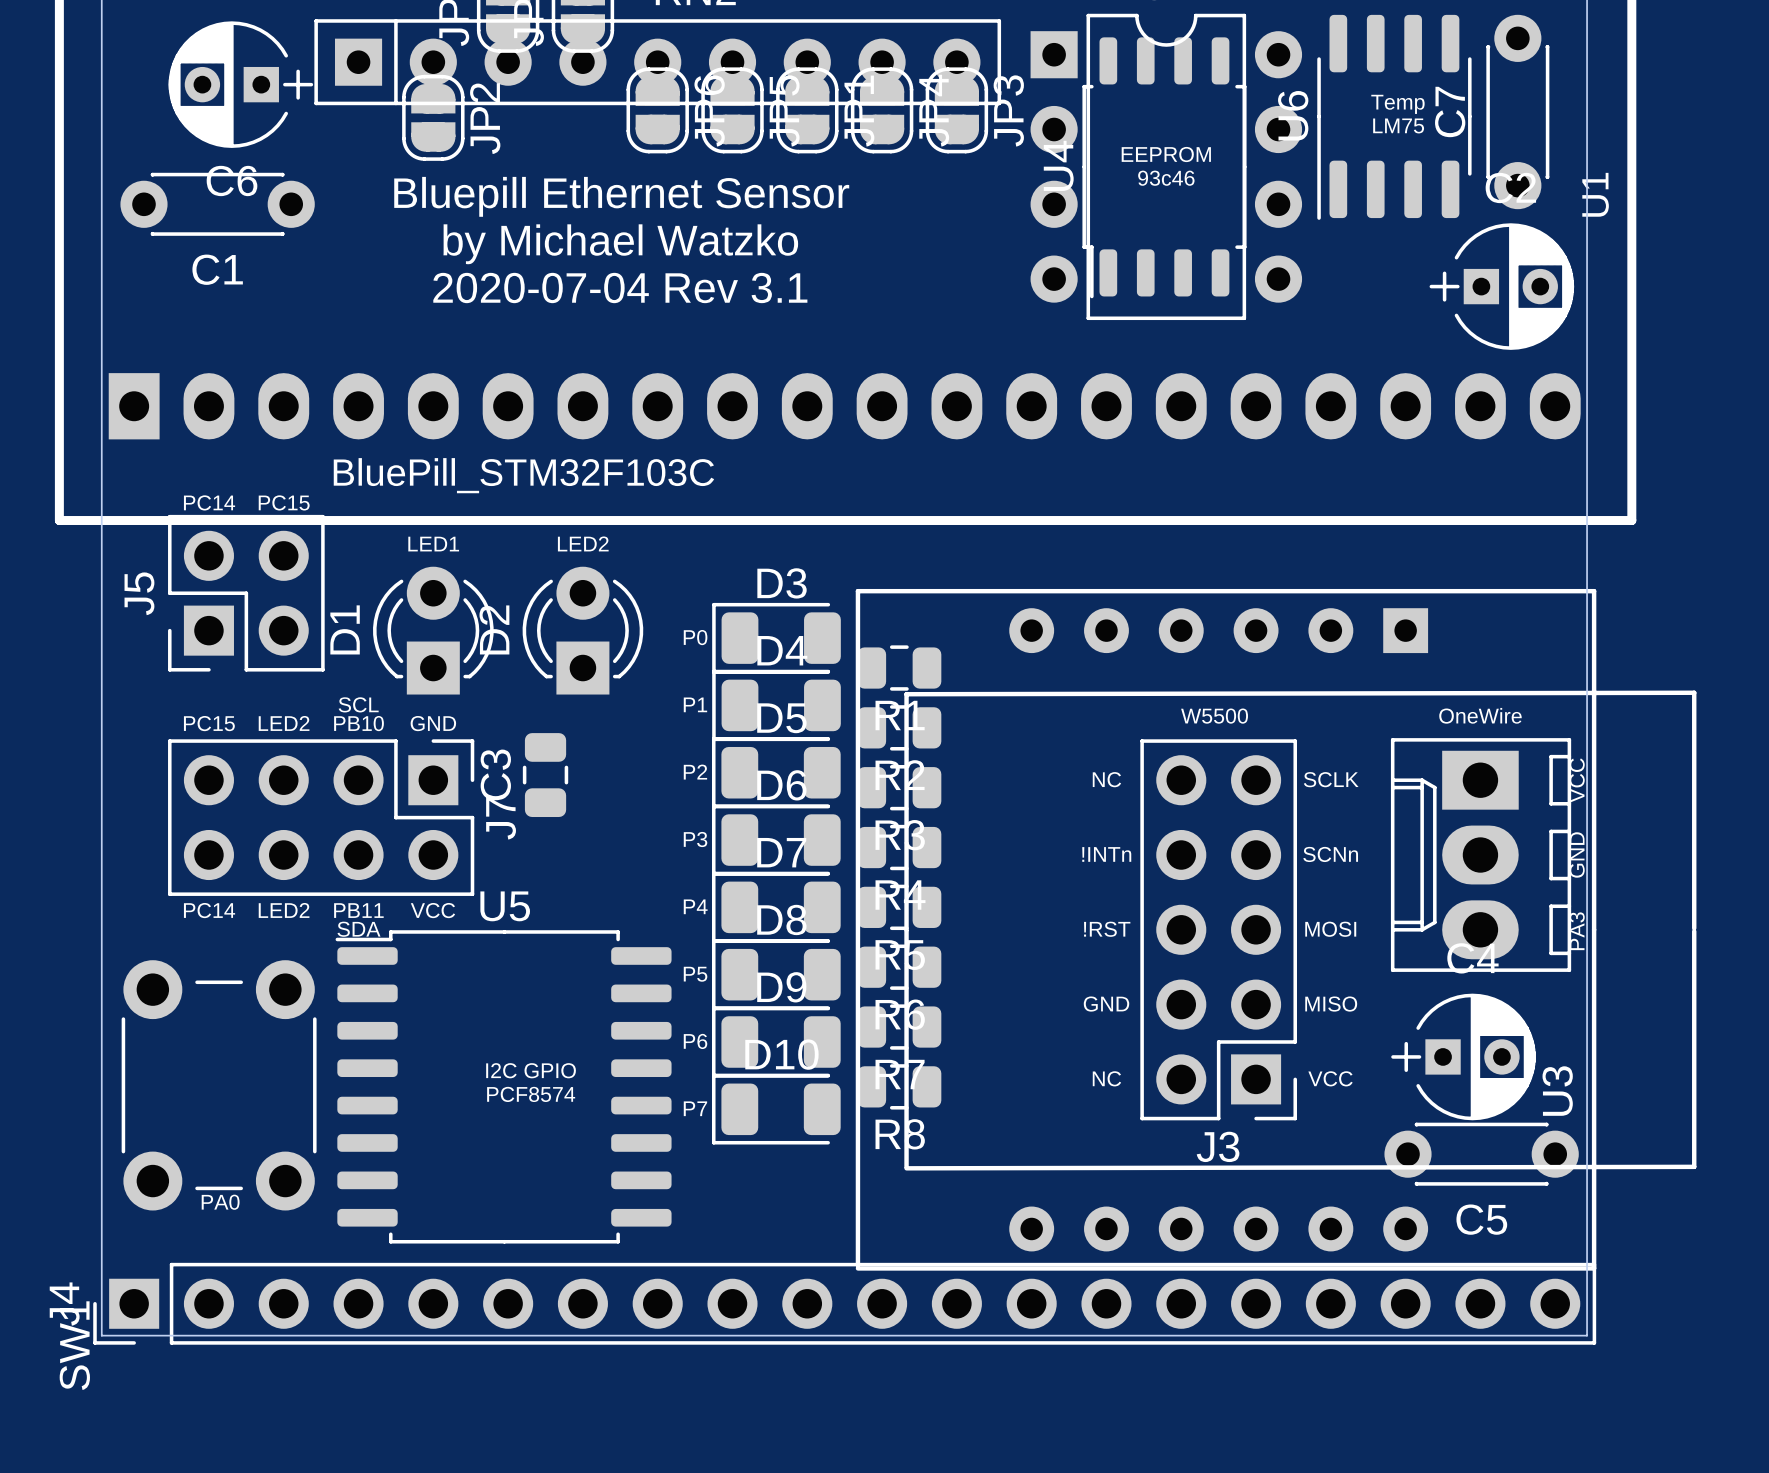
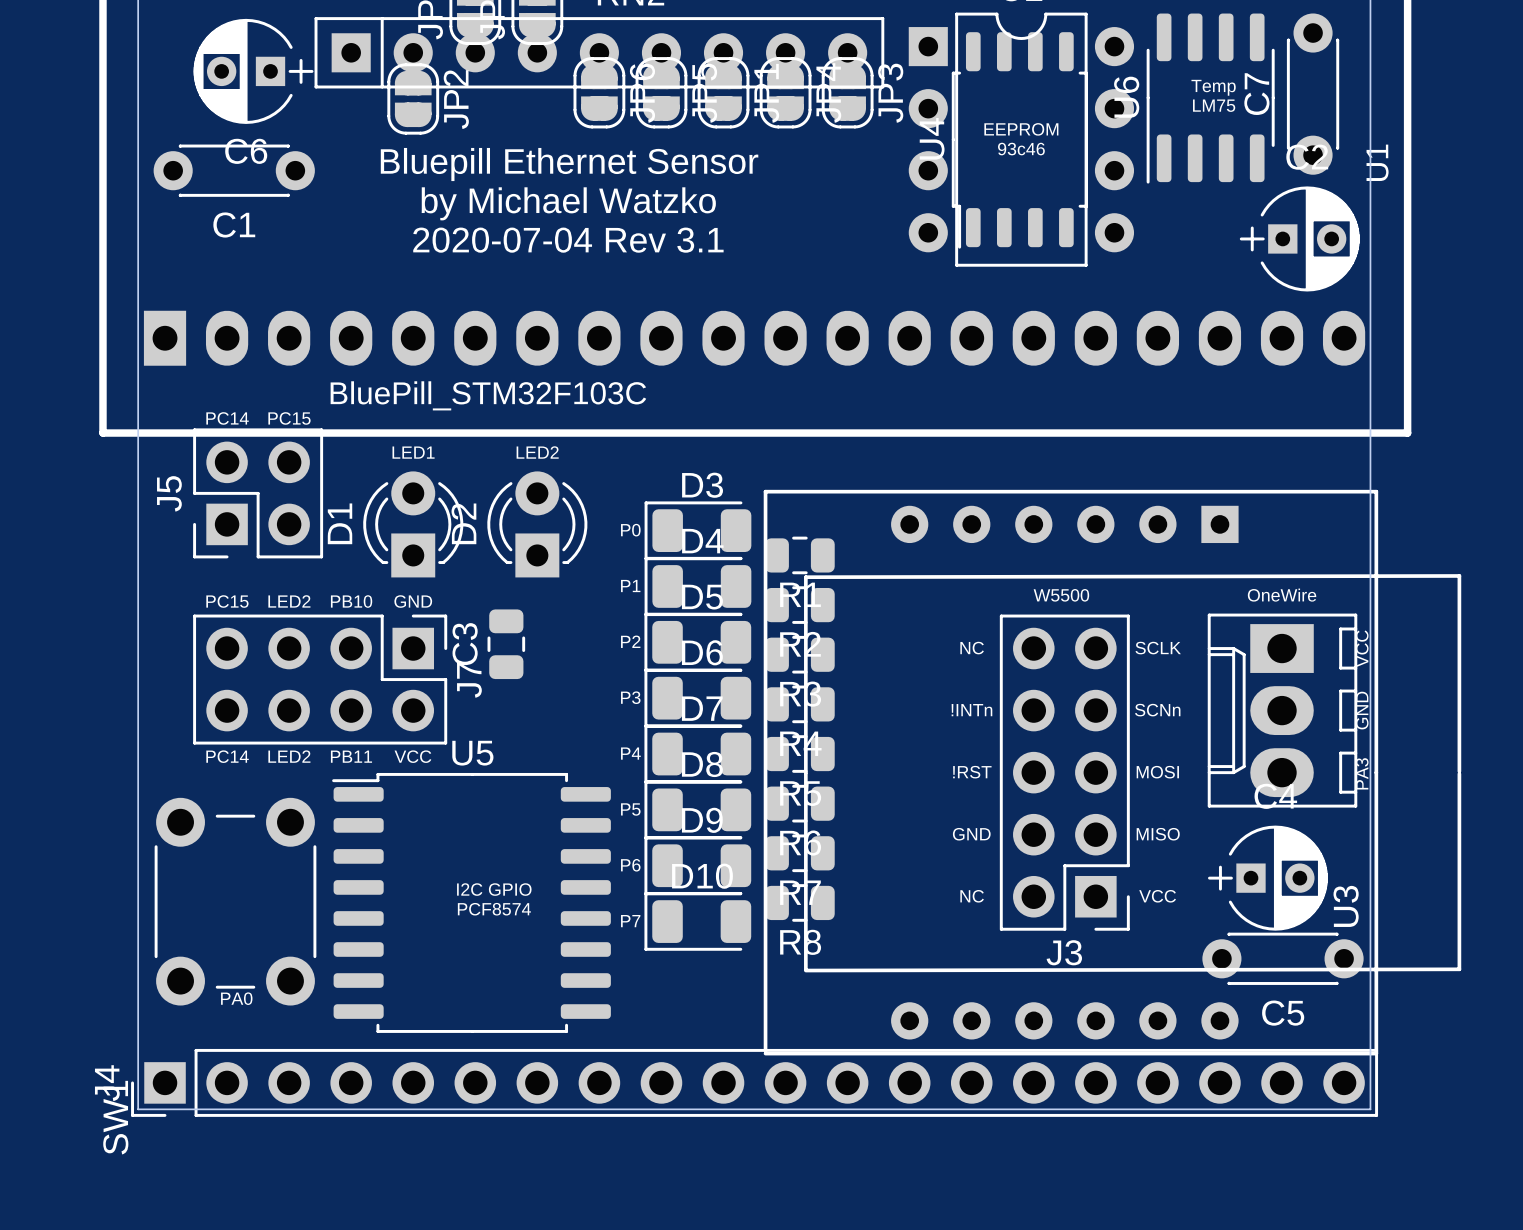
text: SCL (358, 704) -> none
text: SDA (359, 929) -> none

